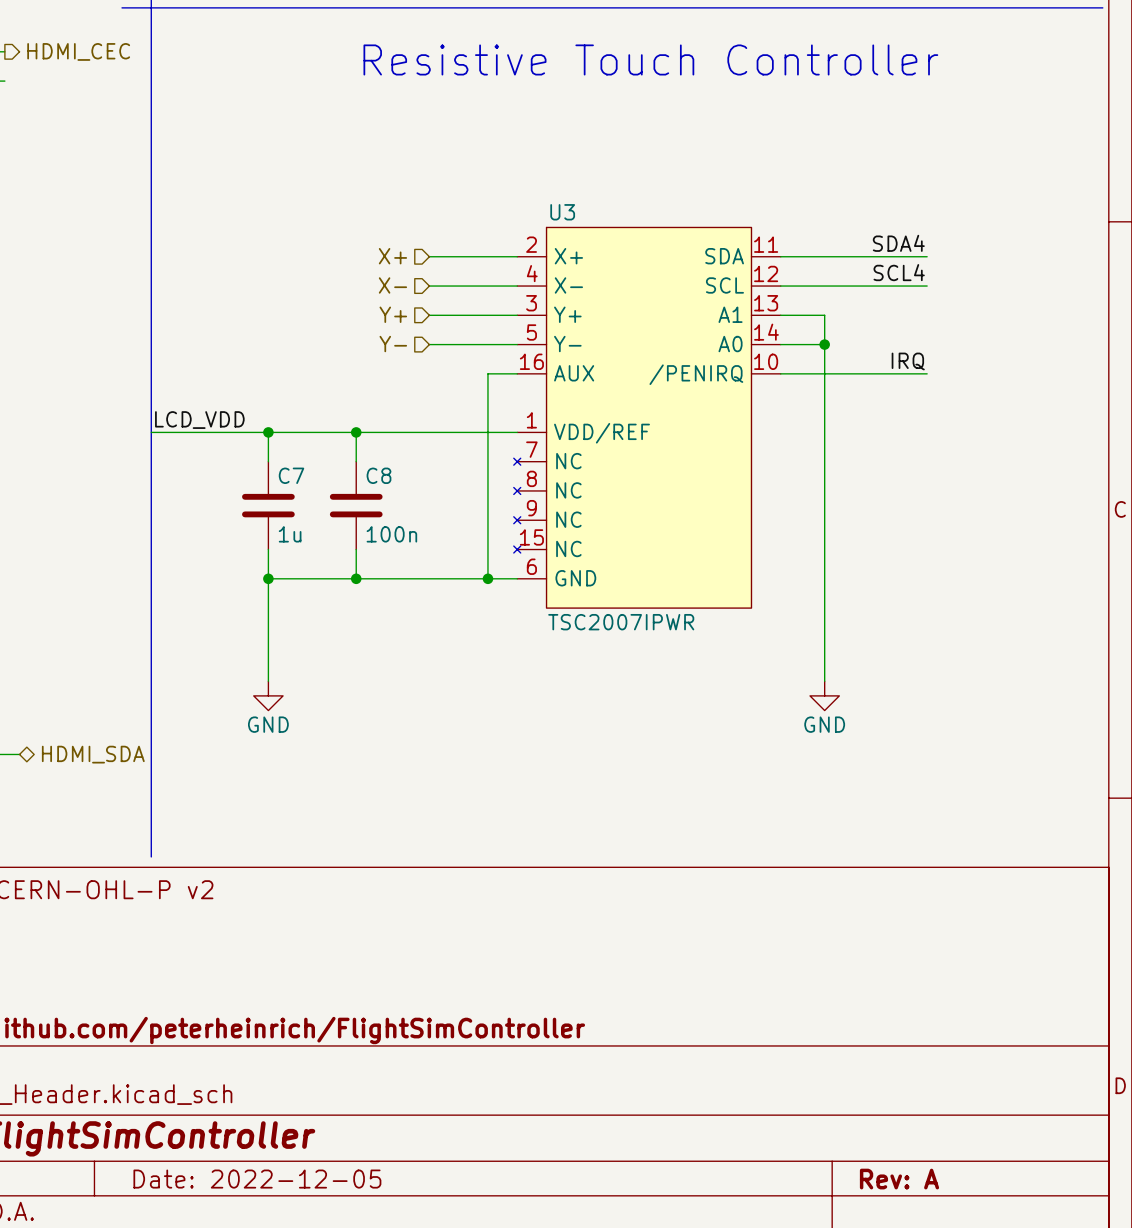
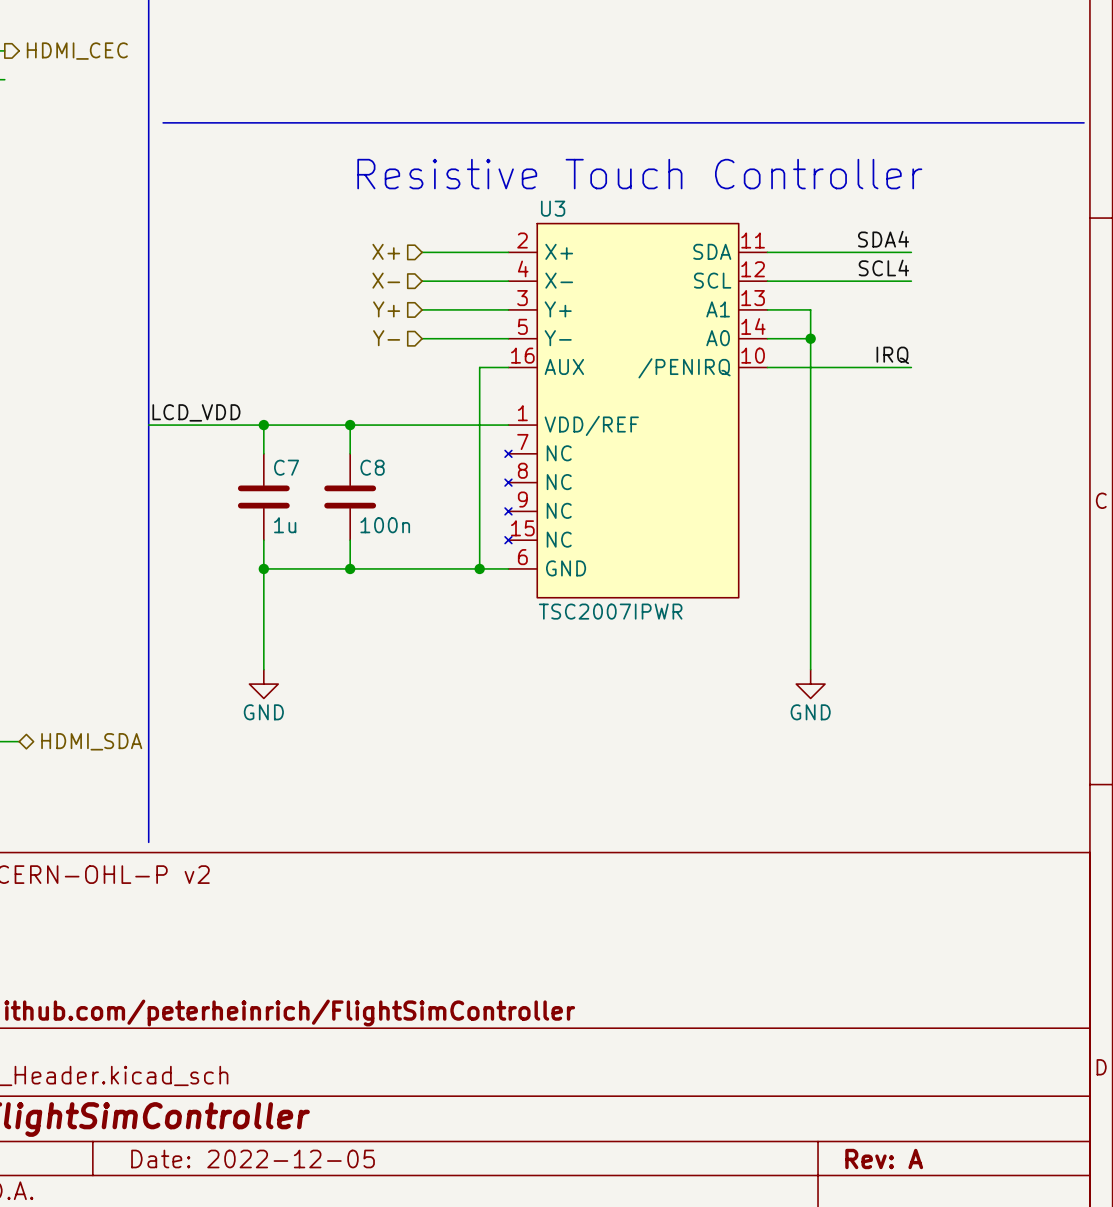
line: (122, 7) (1102, 7) -> none
text position: Resistive Touch Controller (650, 59) -> Resistive Touch Controller (639, 174)
line: none -> (163, 122) (1084, 122)

